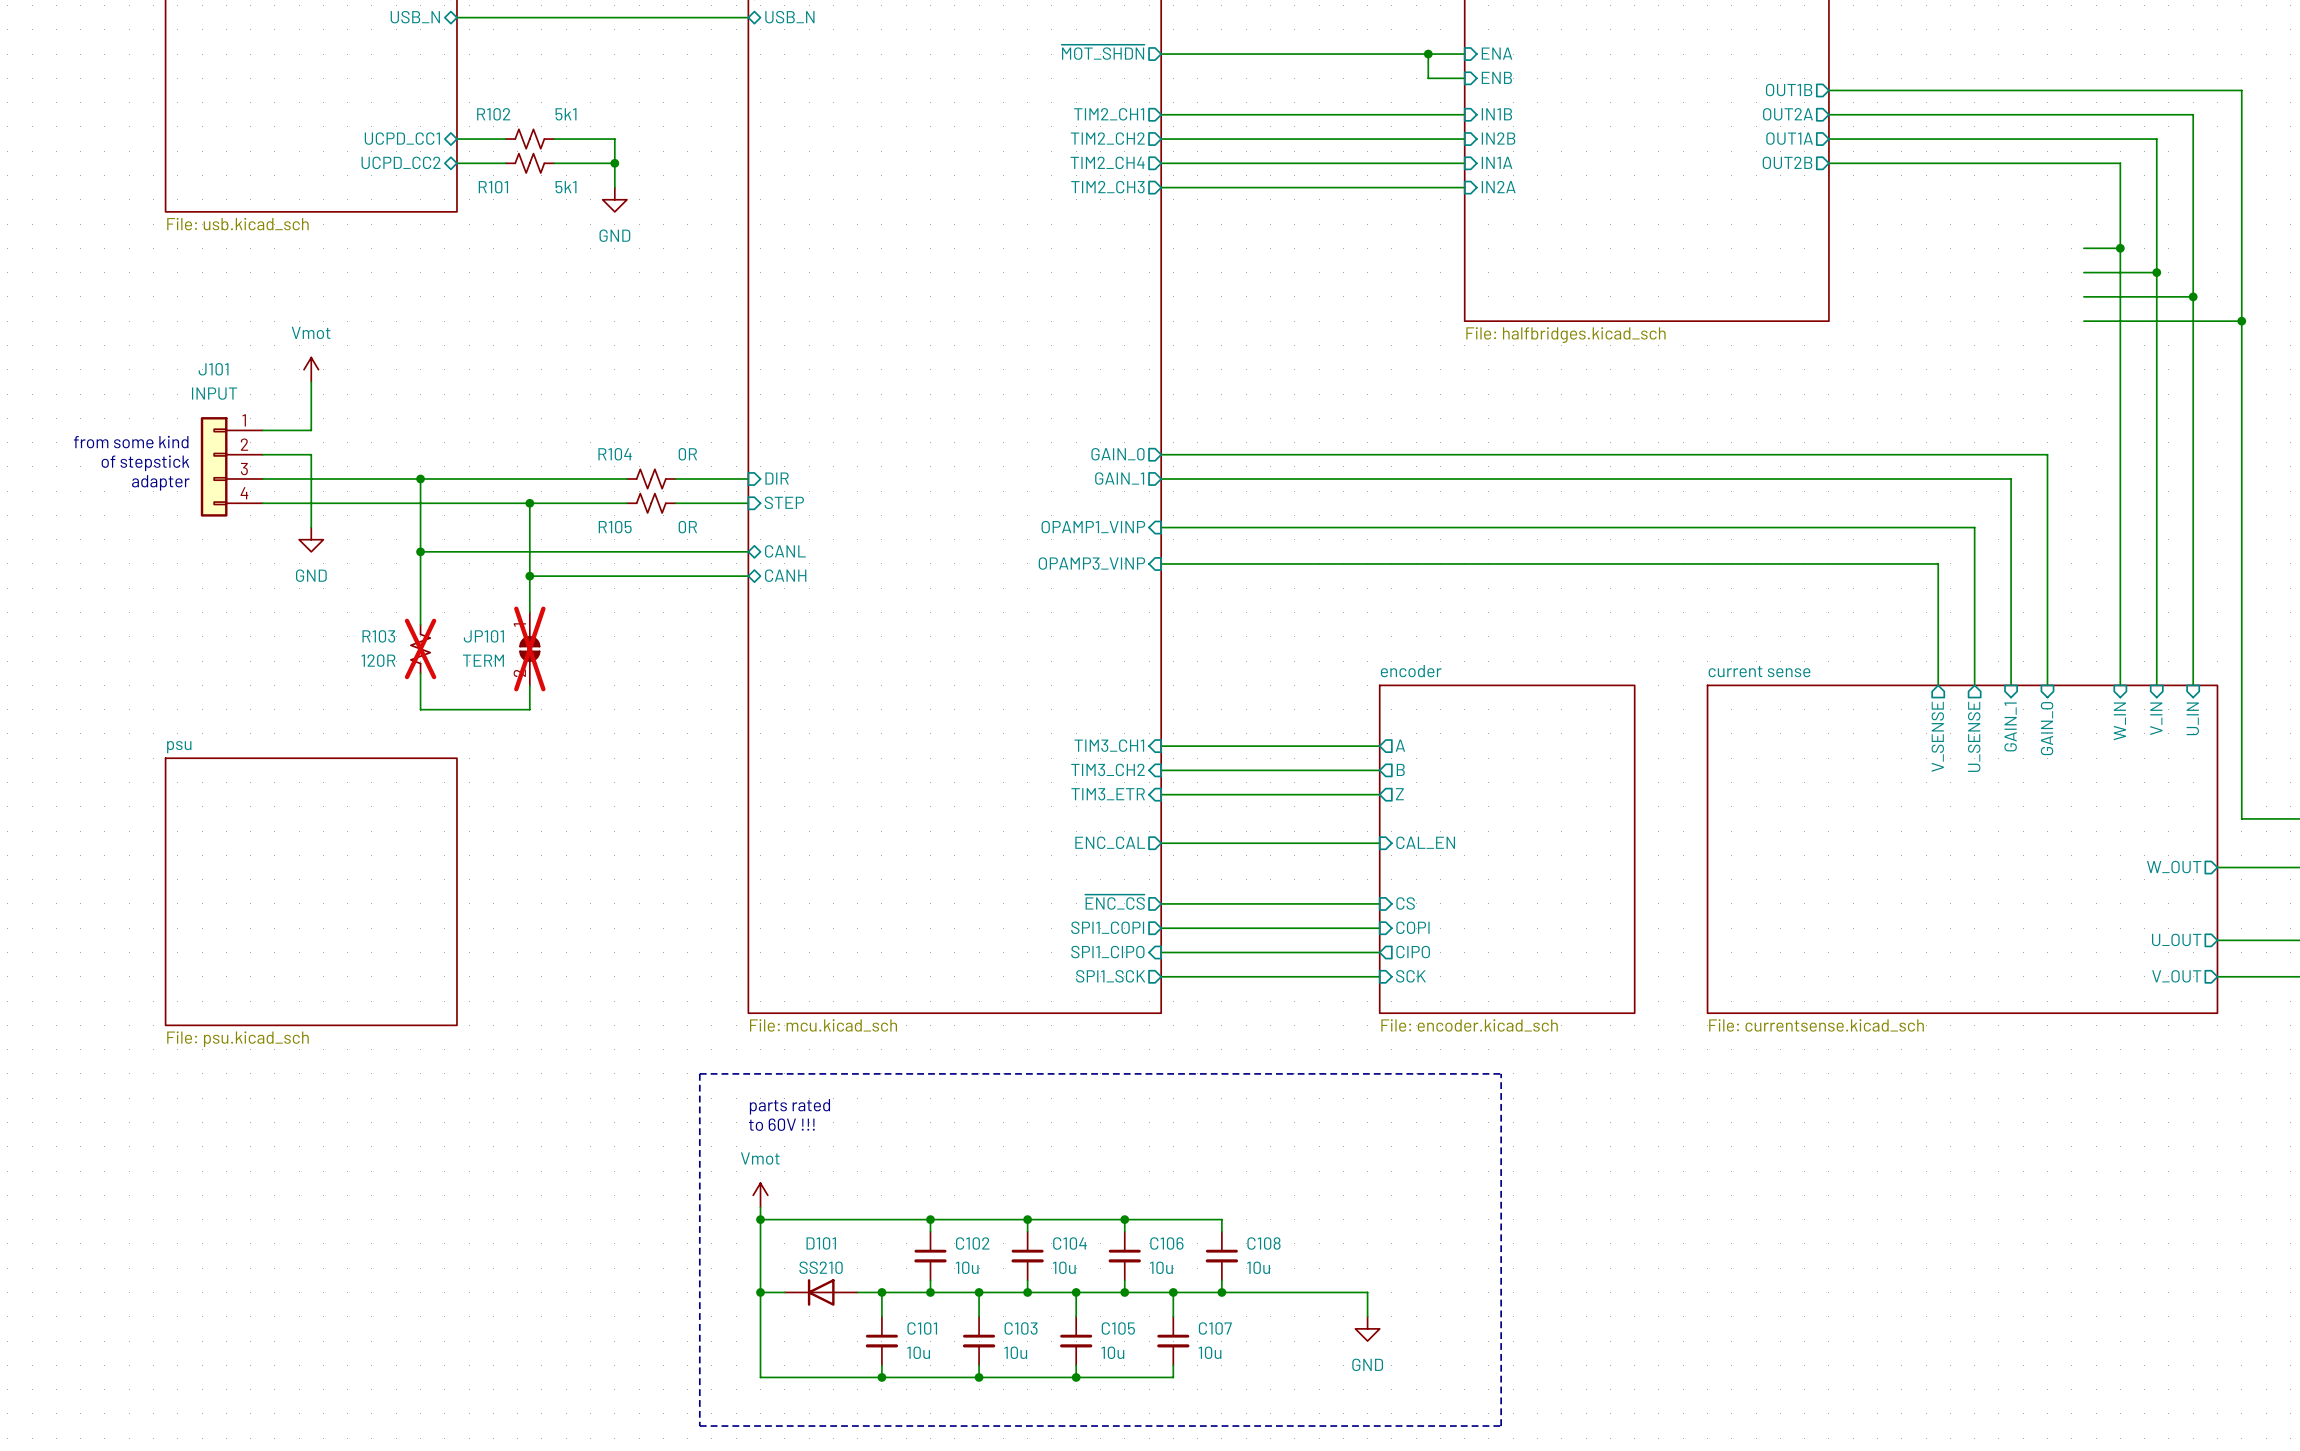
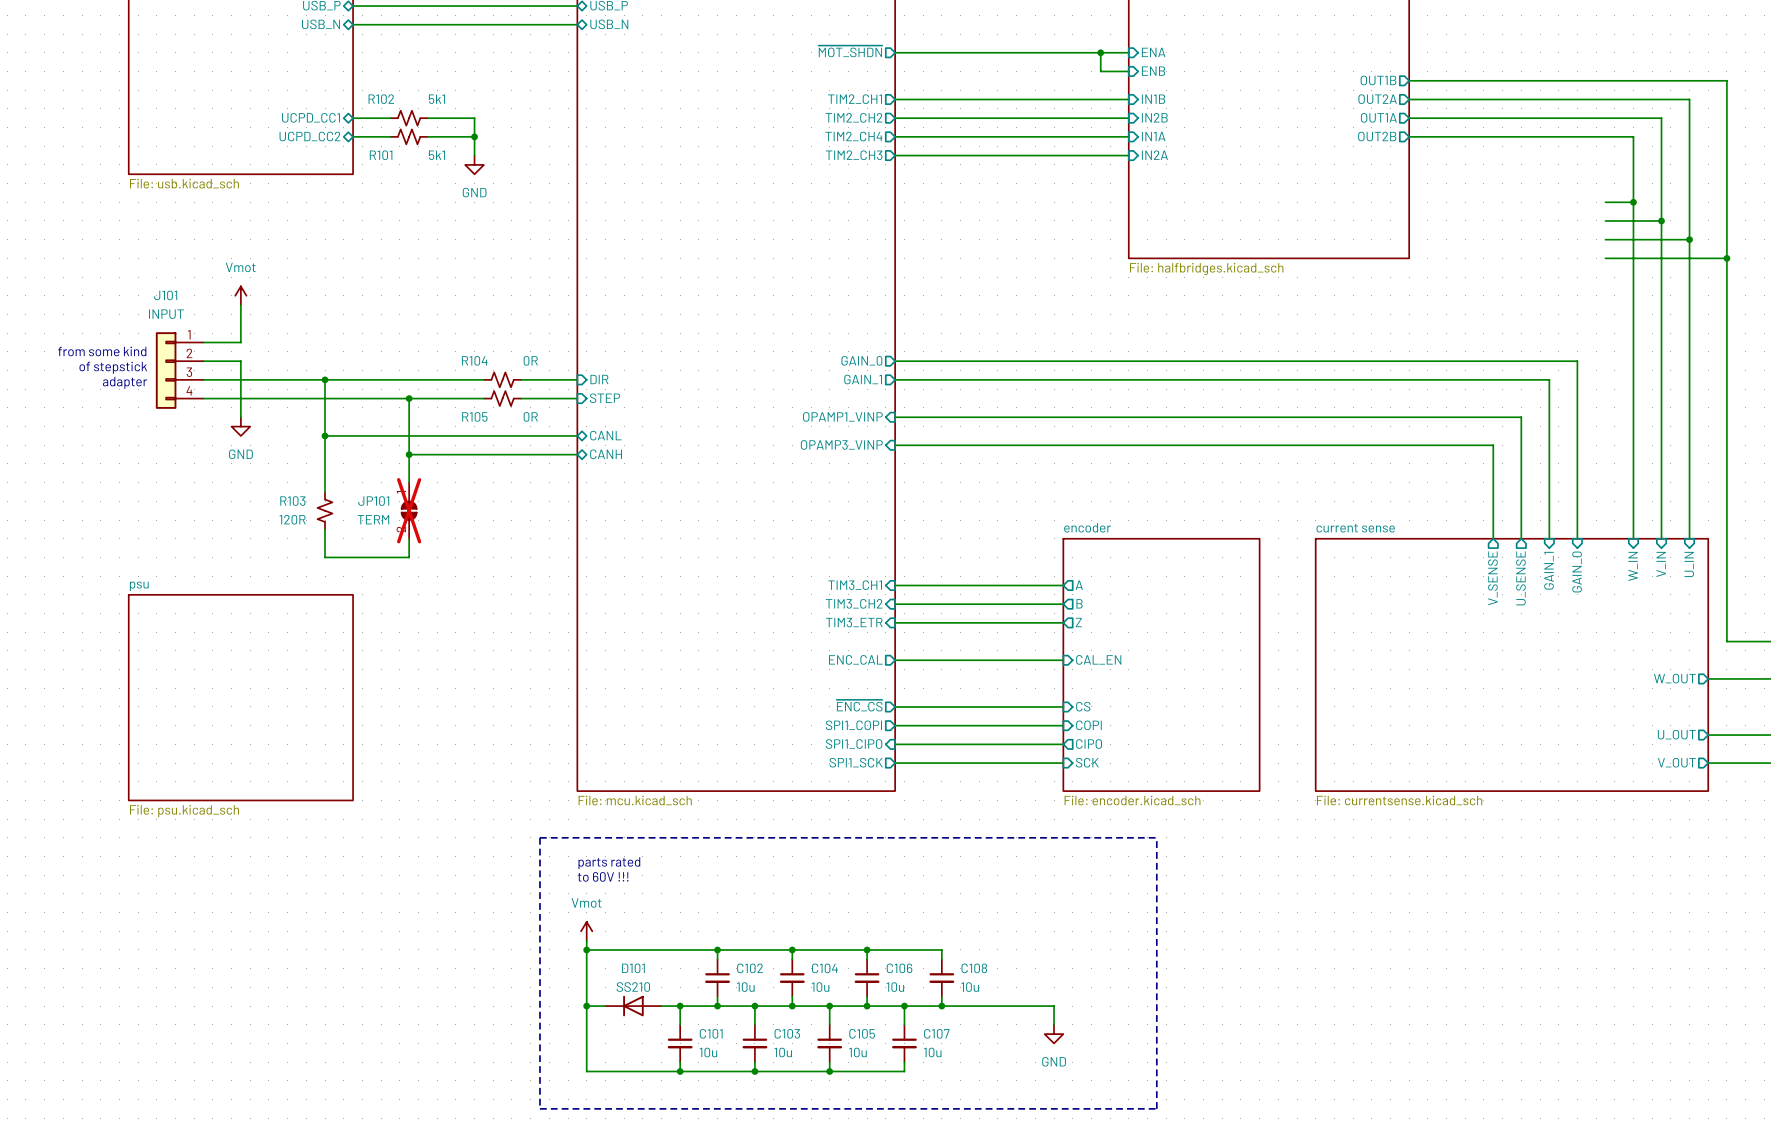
R103 do-not-place cross: (420, 648) -> none

